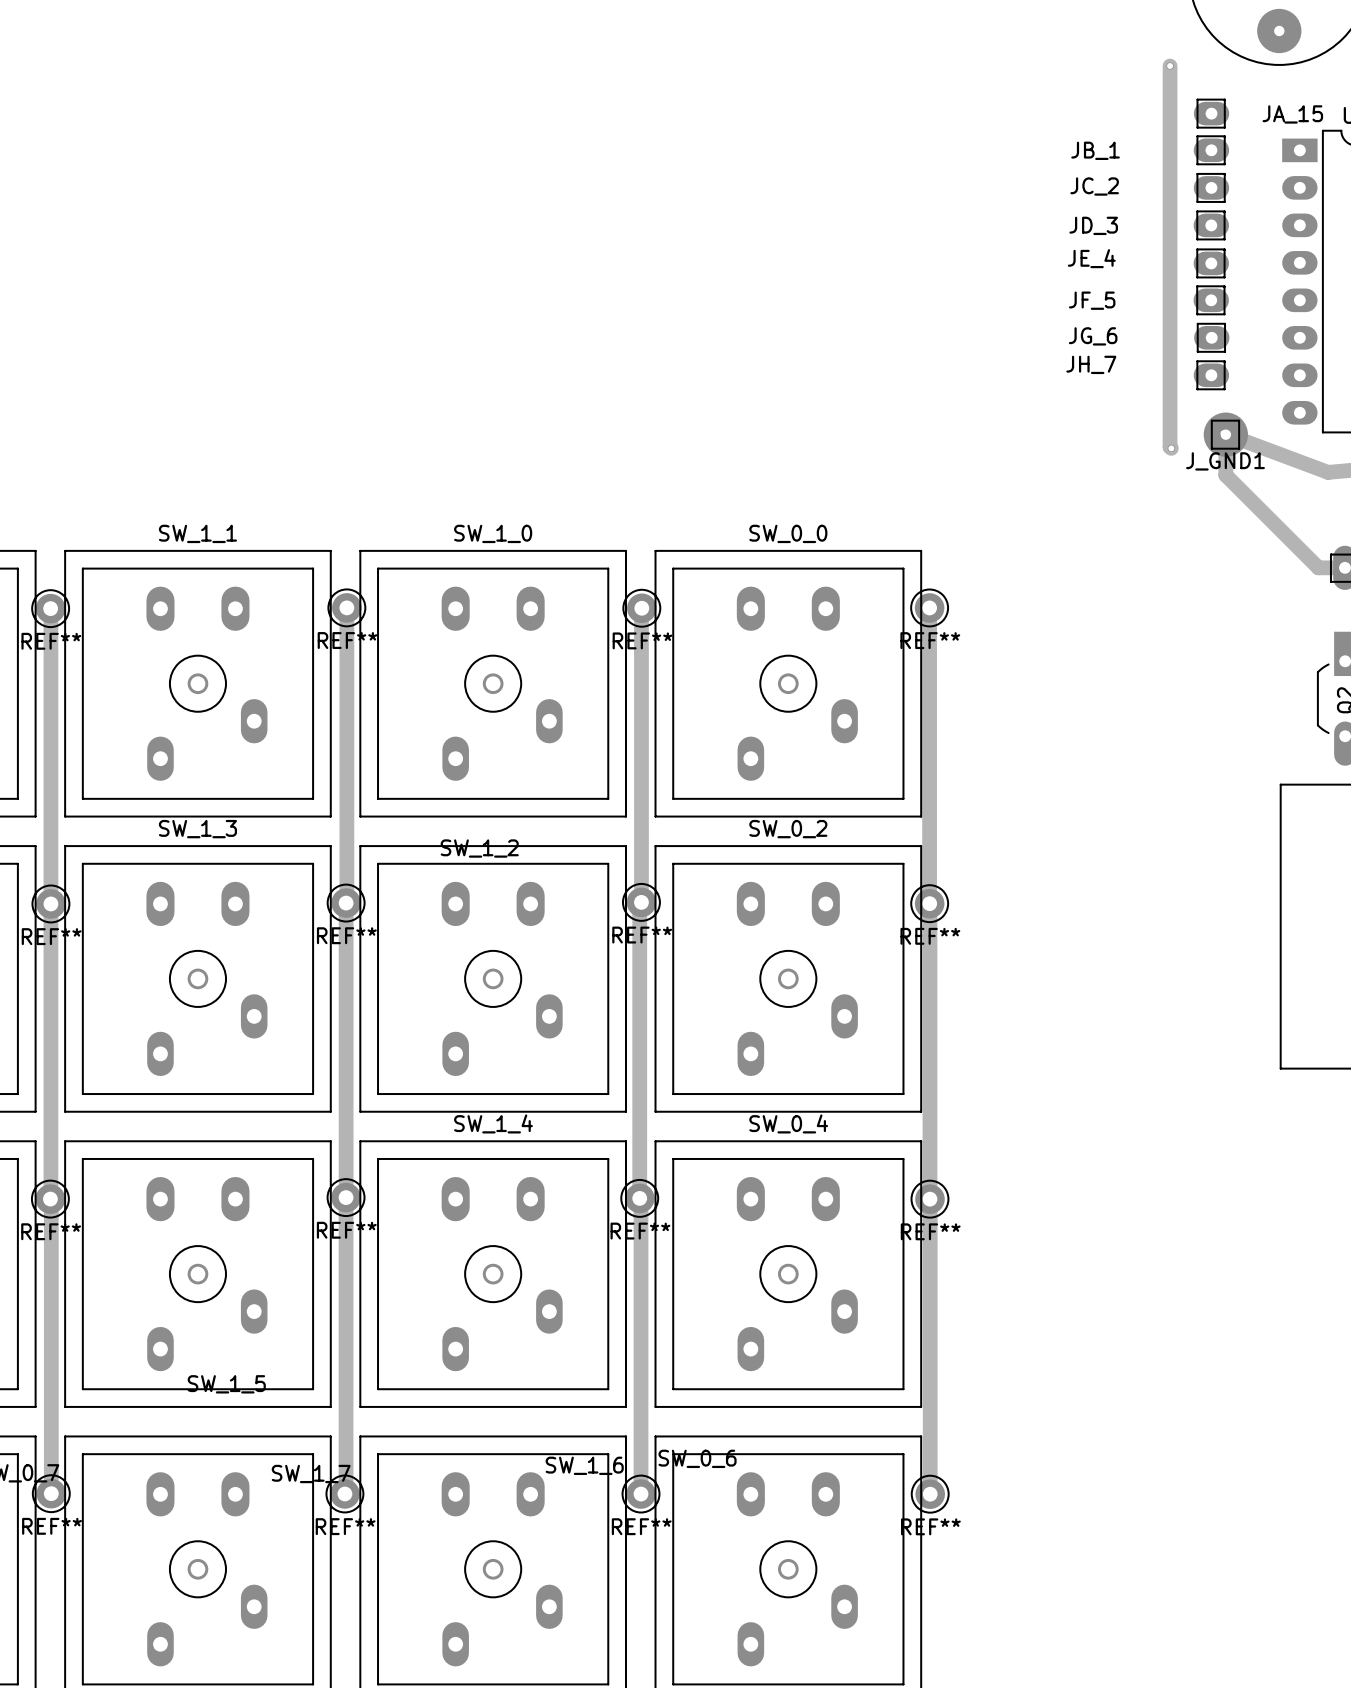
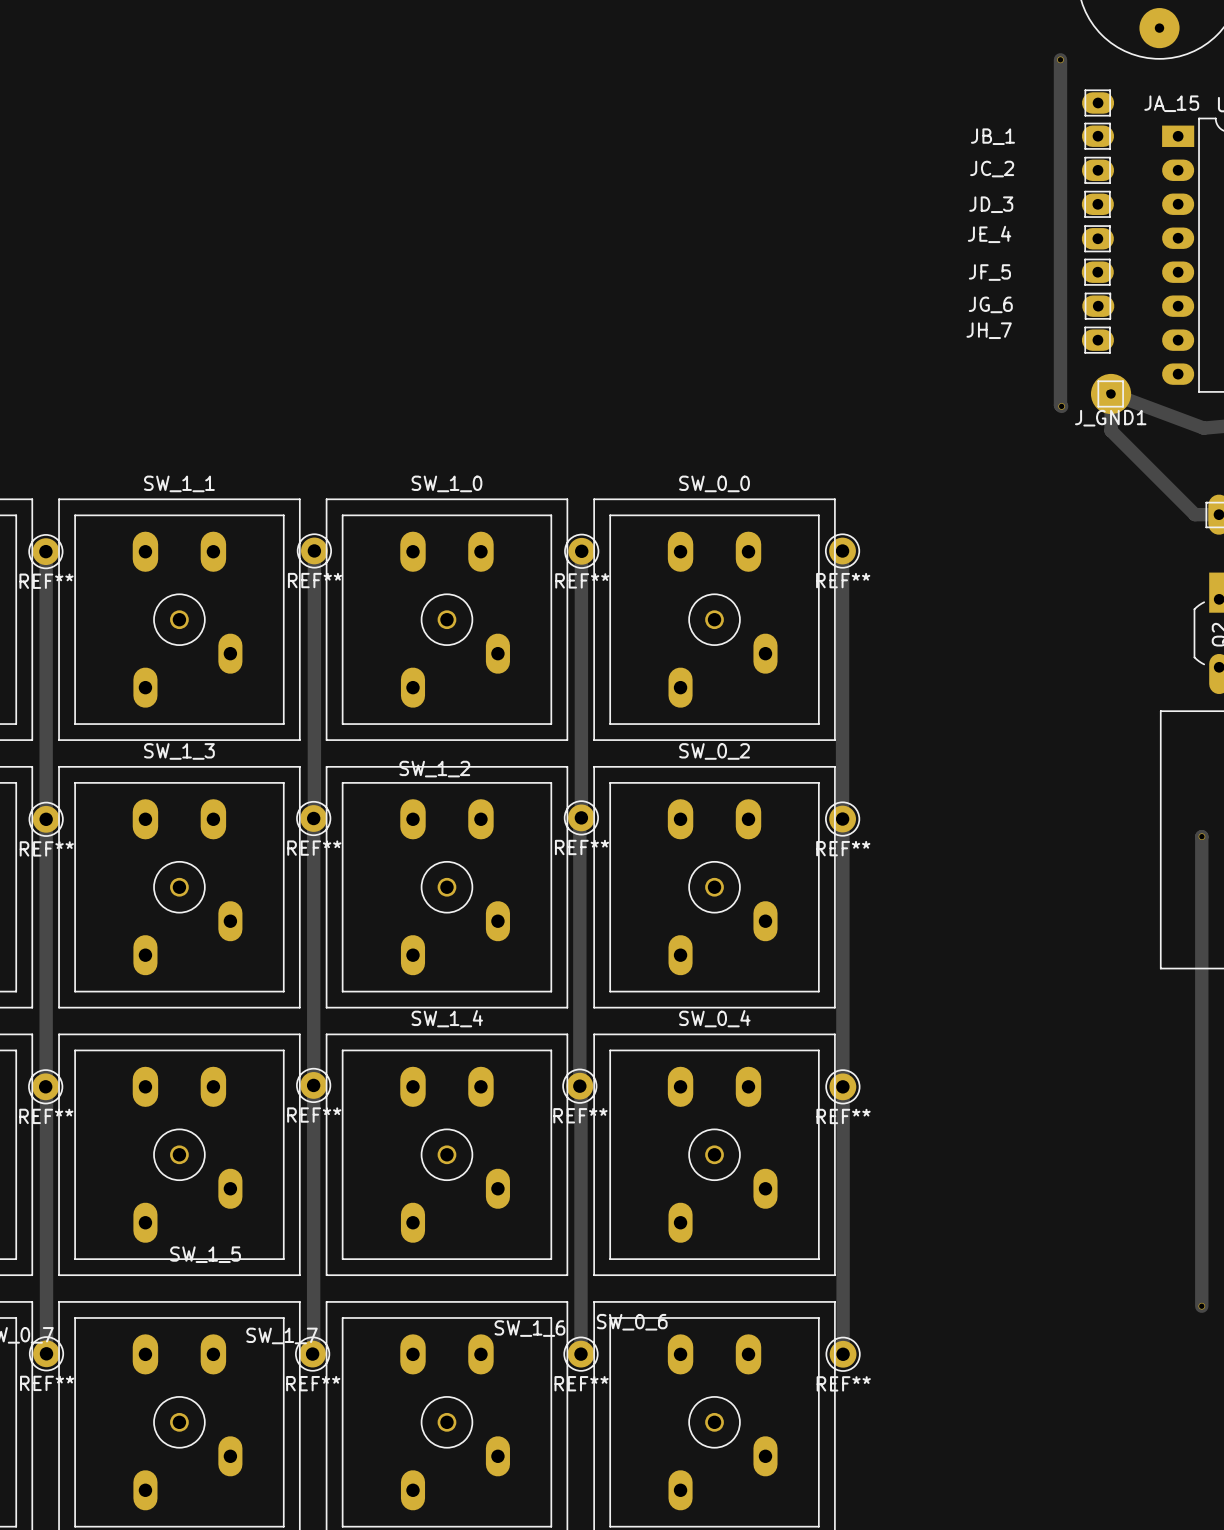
track: none -> (1201, 836) (1201, 1306)
via: none -> (1201, 836)
via: none -> (1201, 1306)

